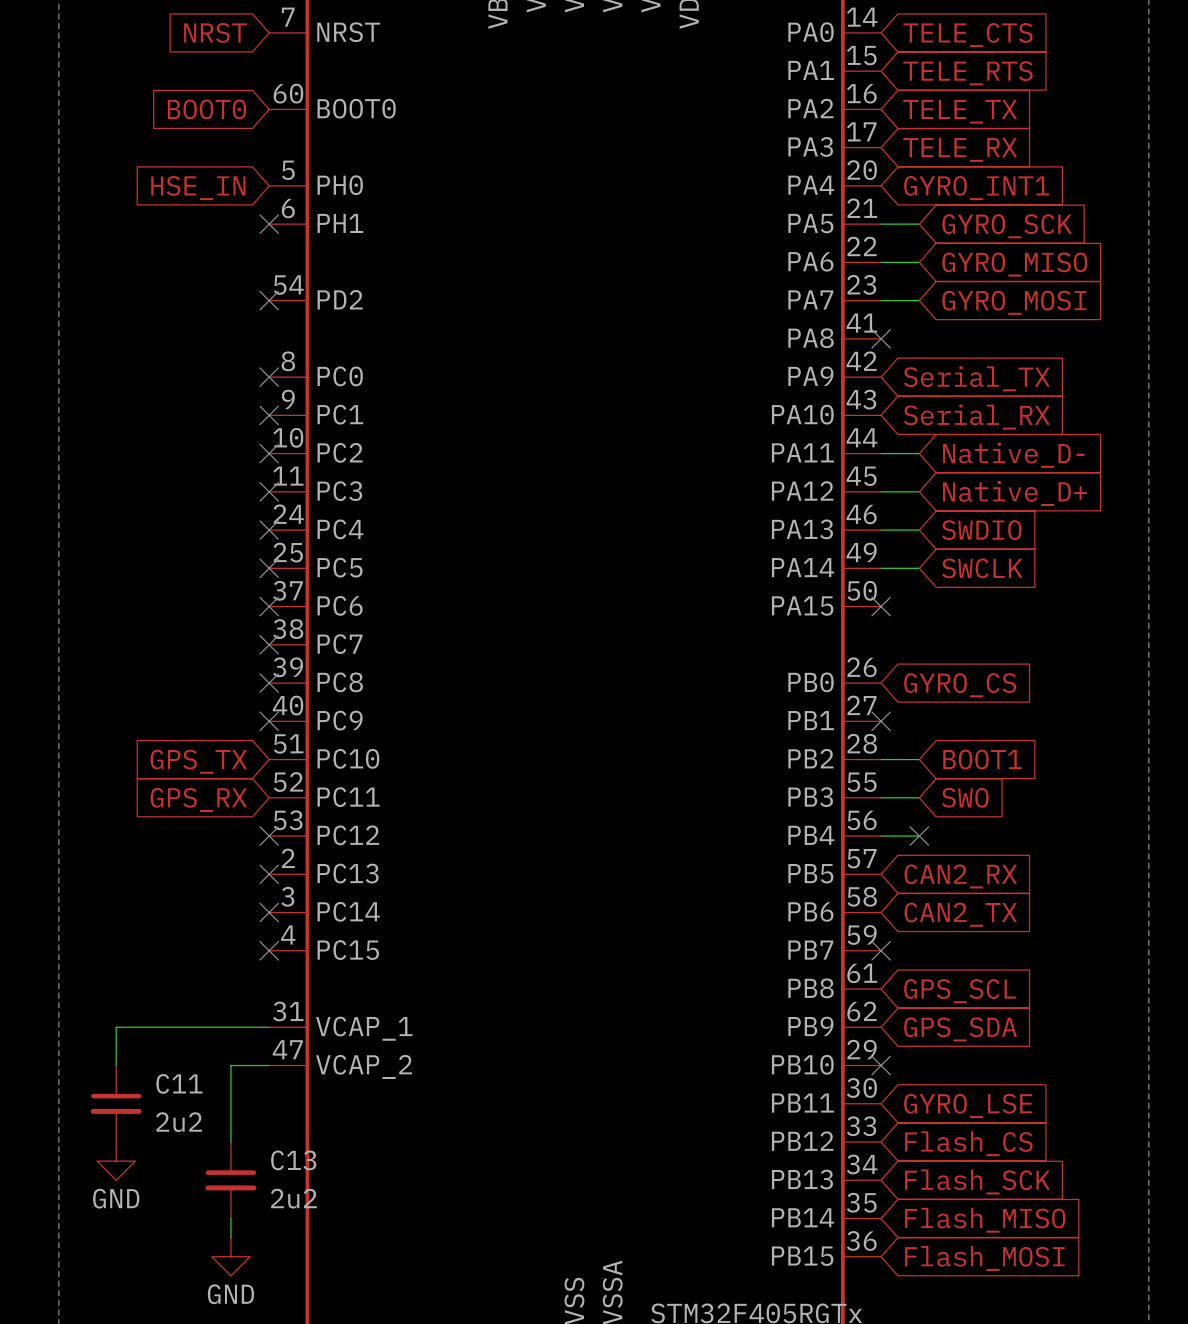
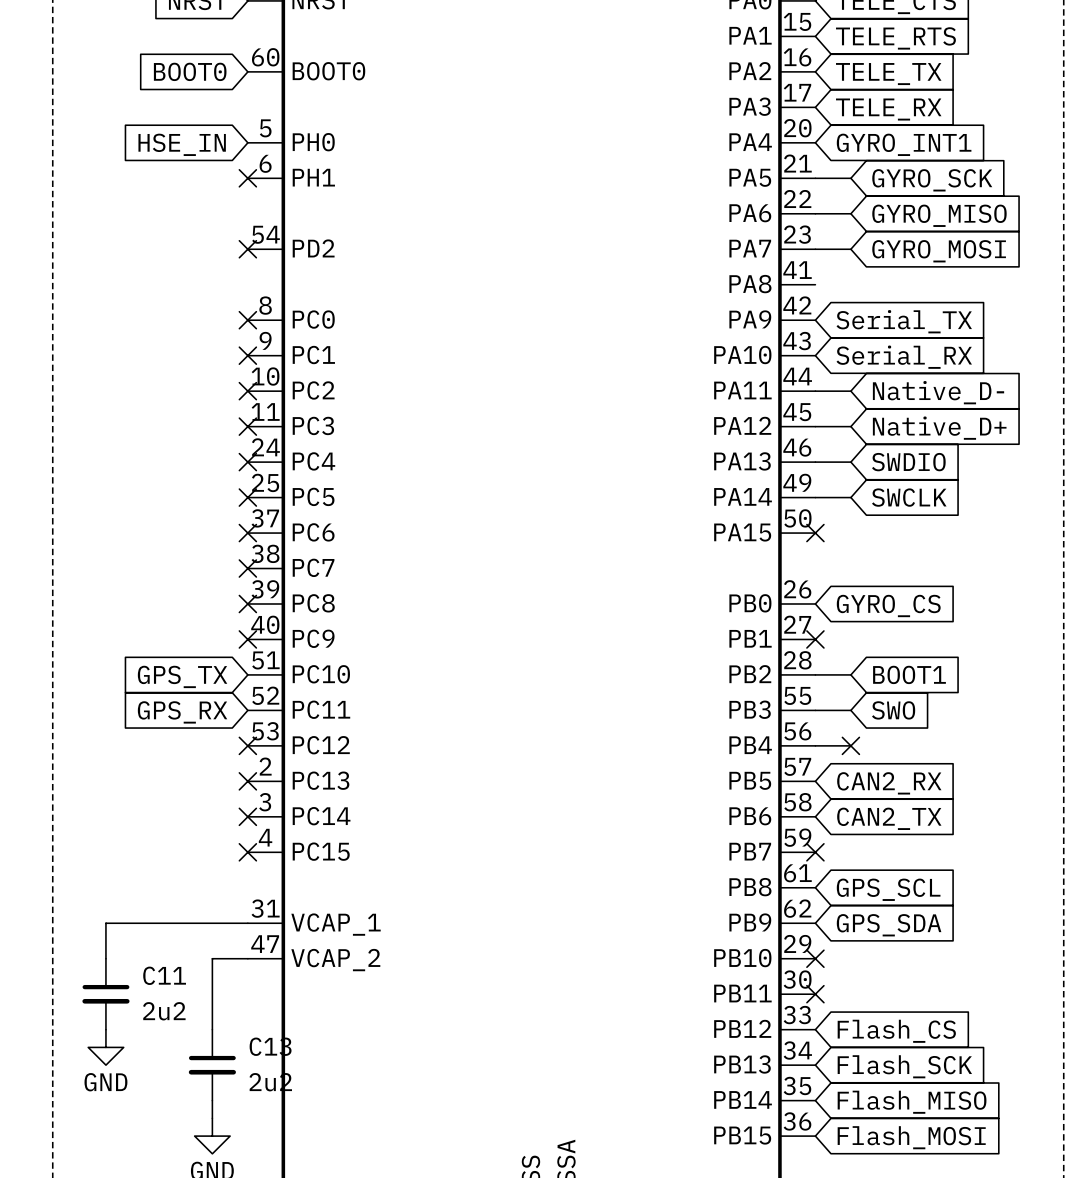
no-connect mark: (881, 338) -> none
no-connect mark: none -> (815, 994)
global label: GYRO_LSE (968, 1105) -> none

